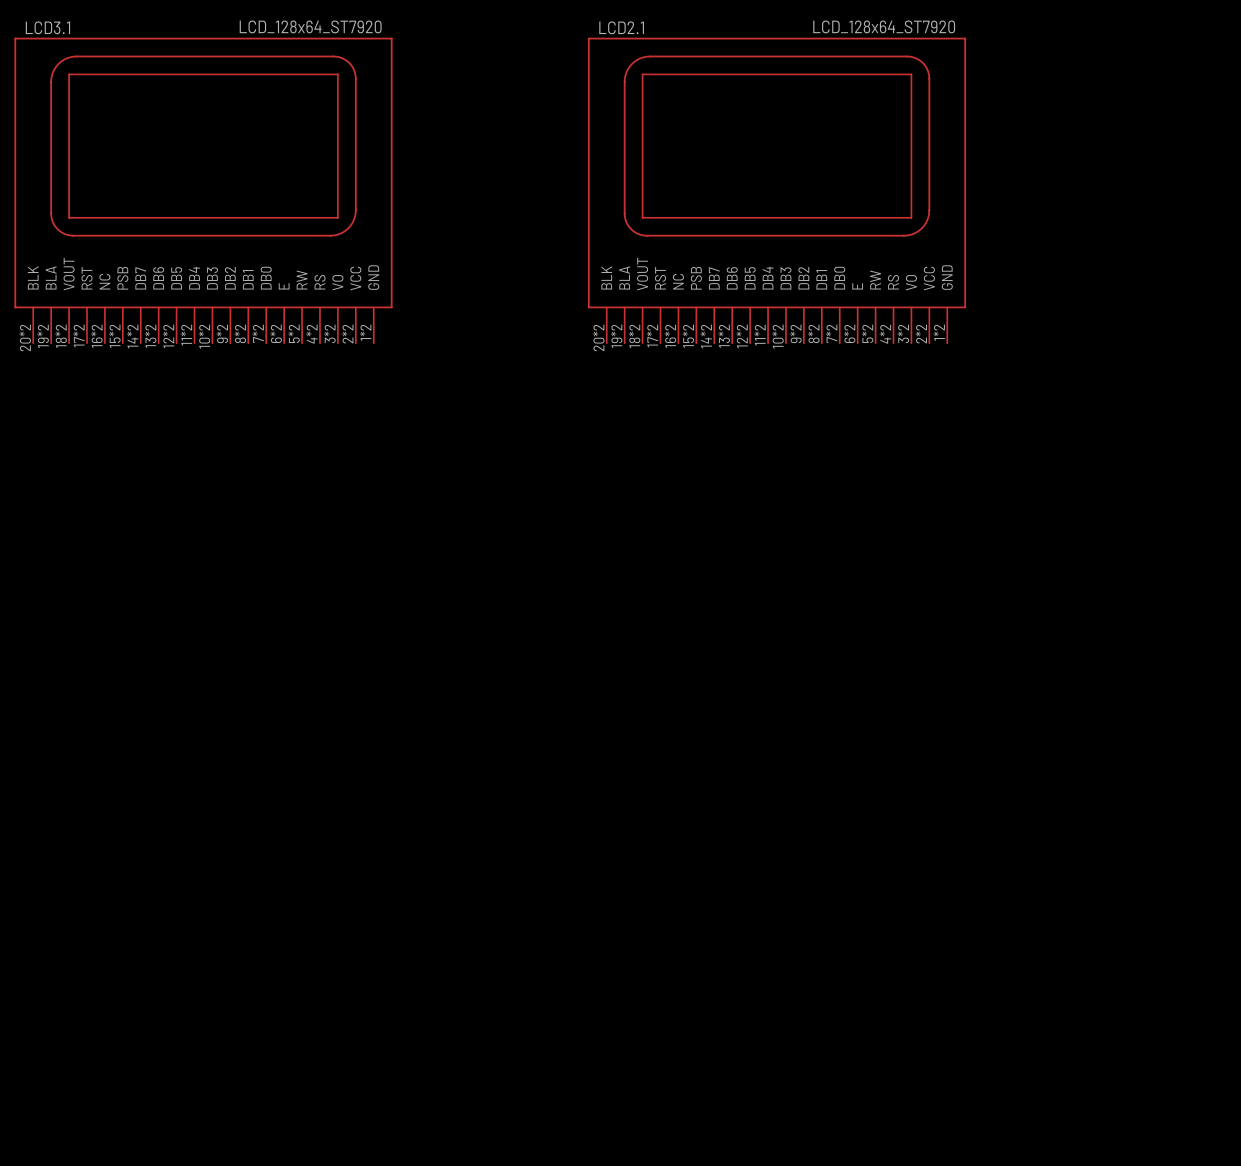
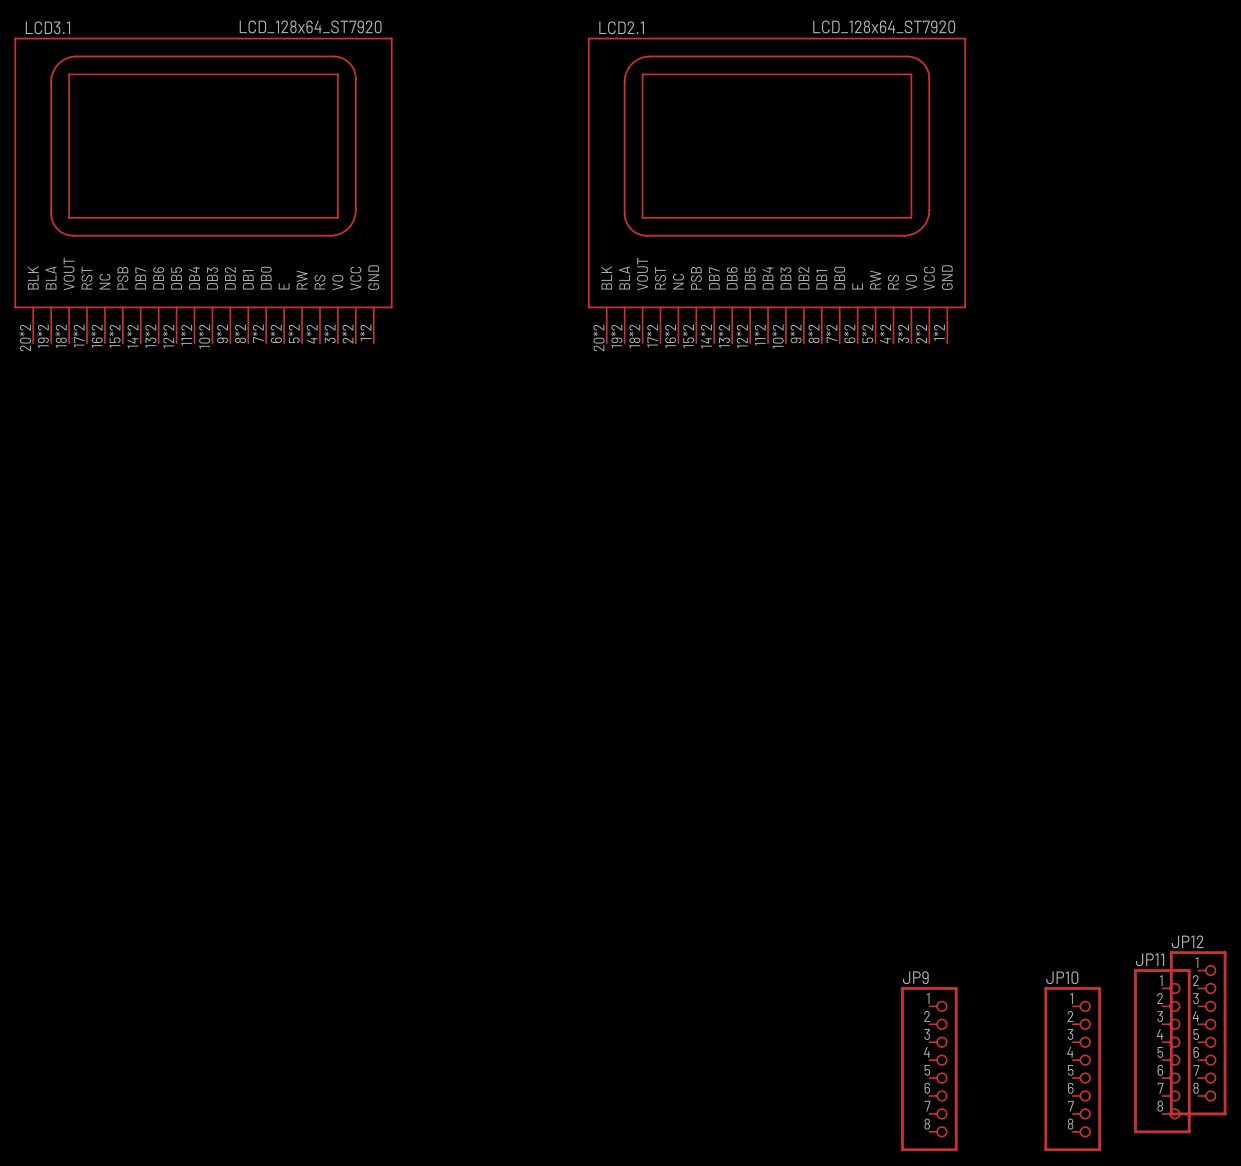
JP12: none -> (1198, 1033)
JP11: none -> (1162, 1051)
JP9: none -> (929, 1069)
JP10: none -> (1072, 1069)

